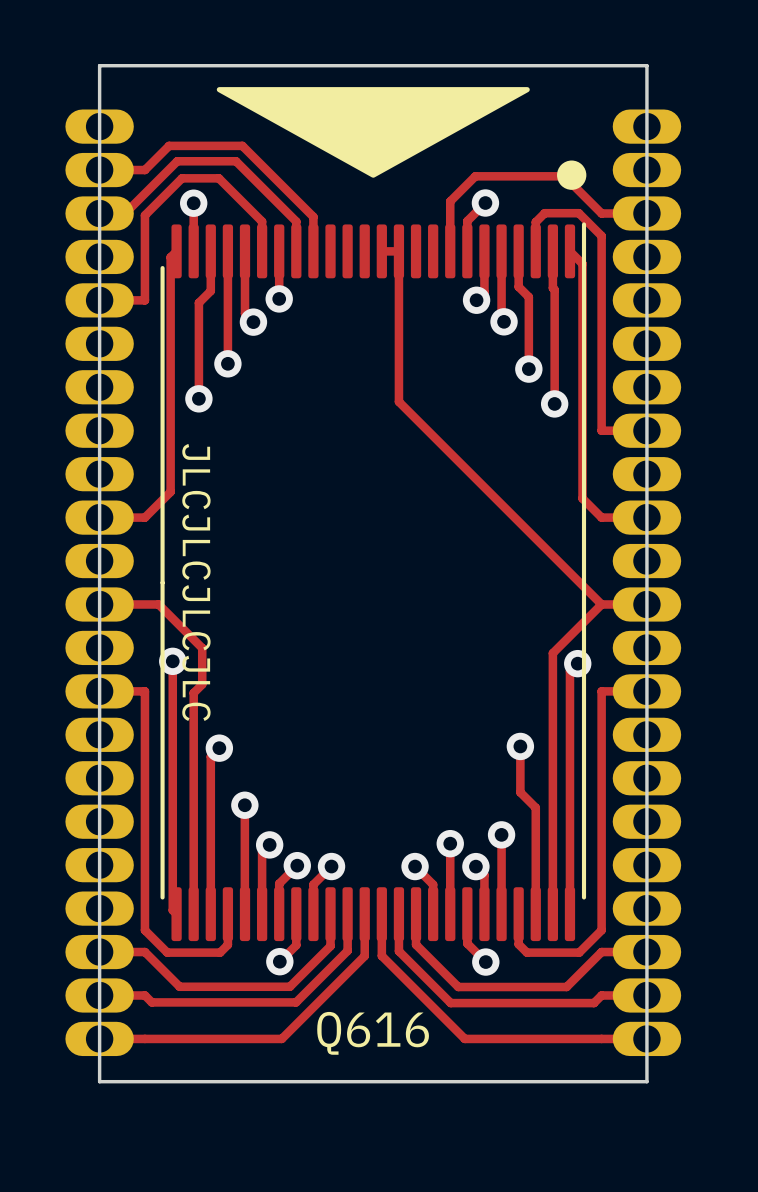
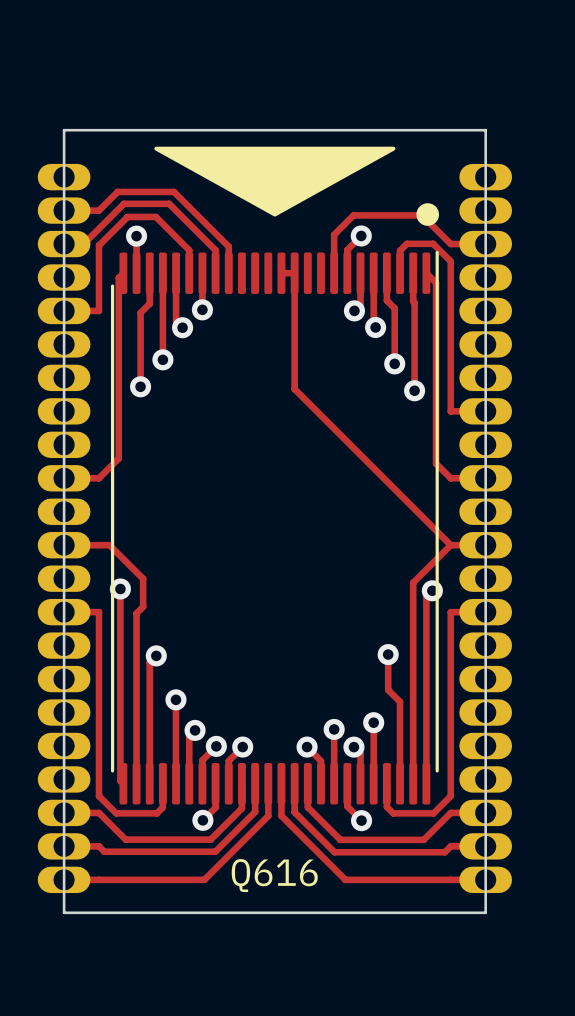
text: JLCJLCJLCJLC (196, 582) -> none

